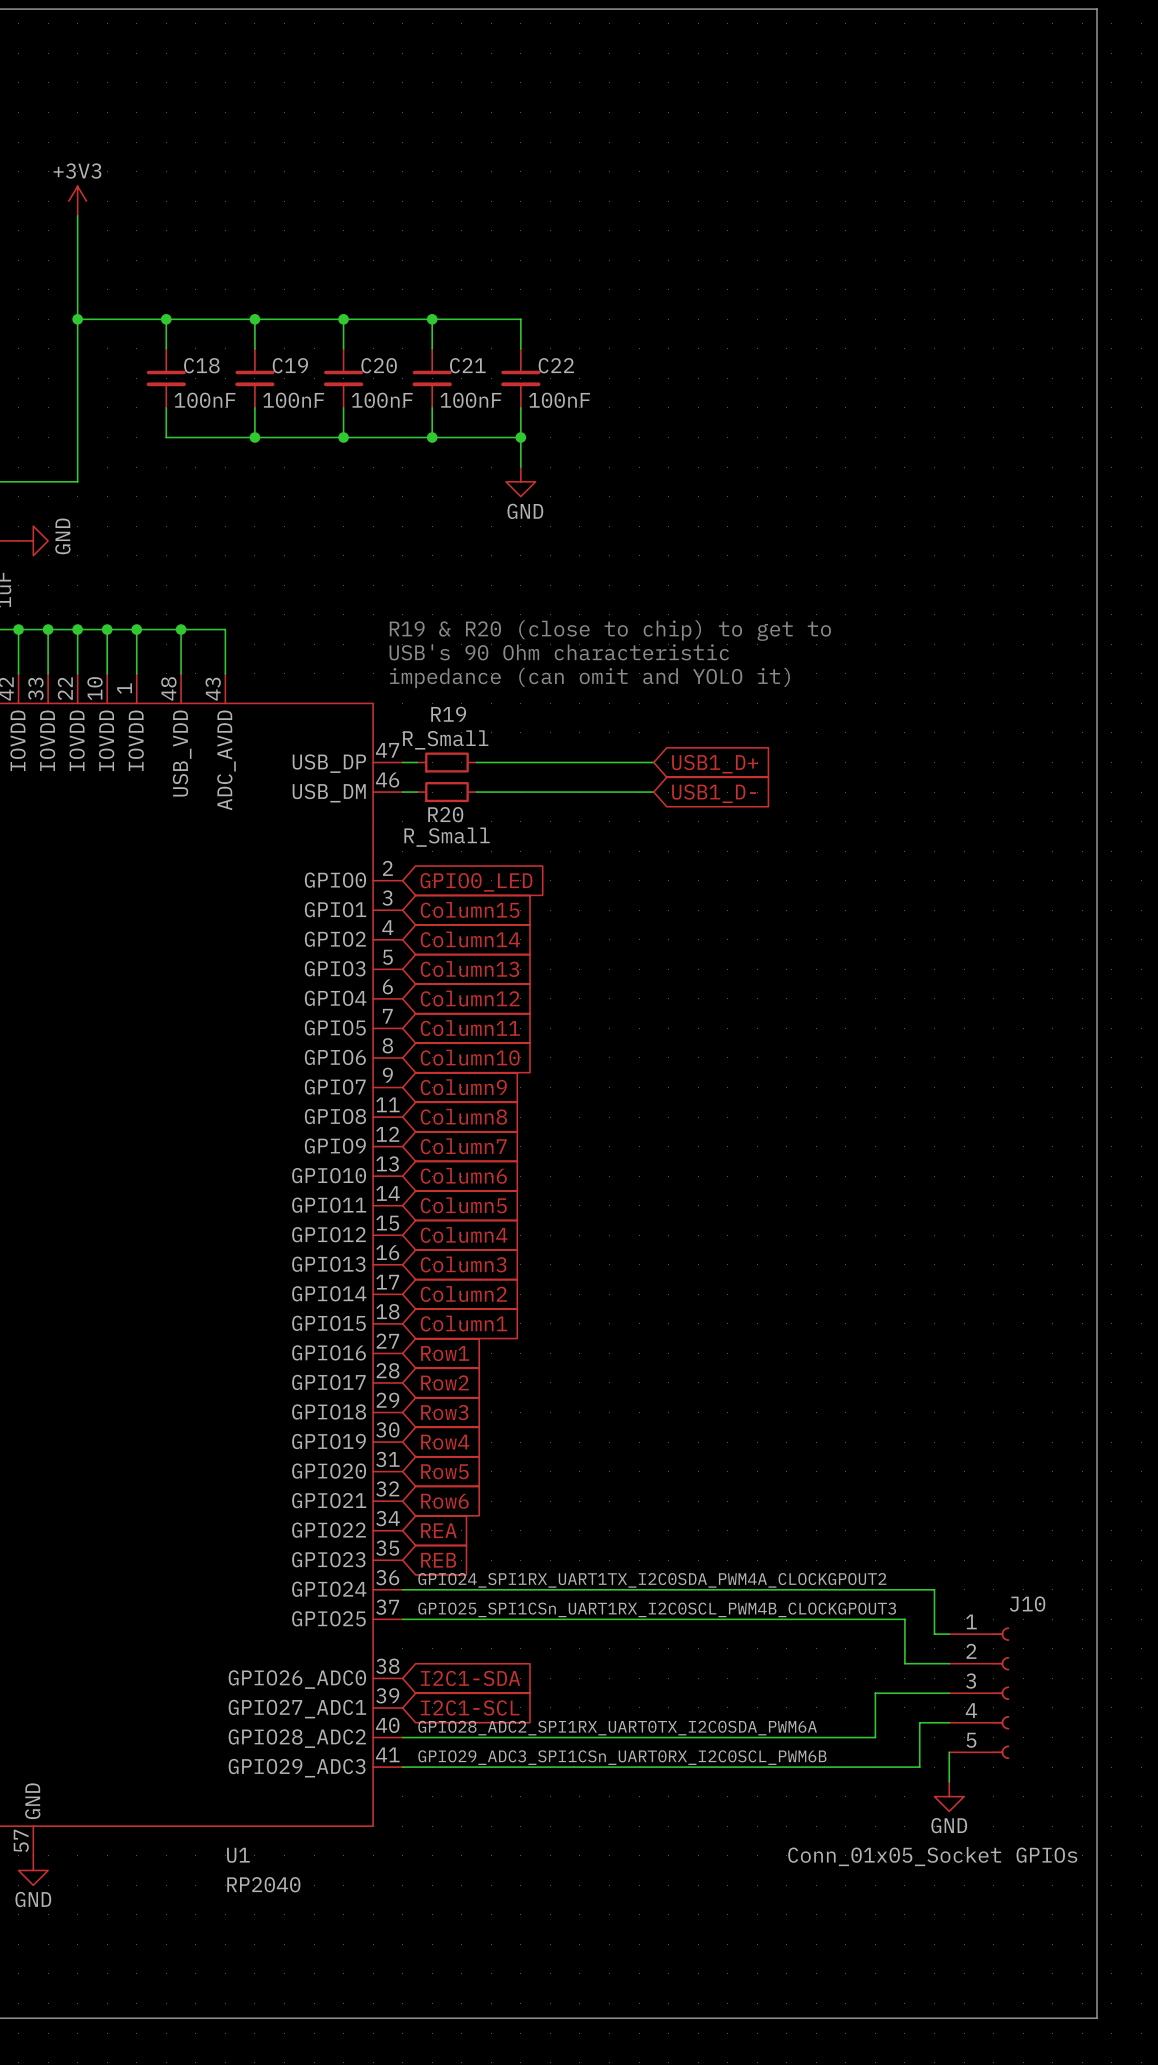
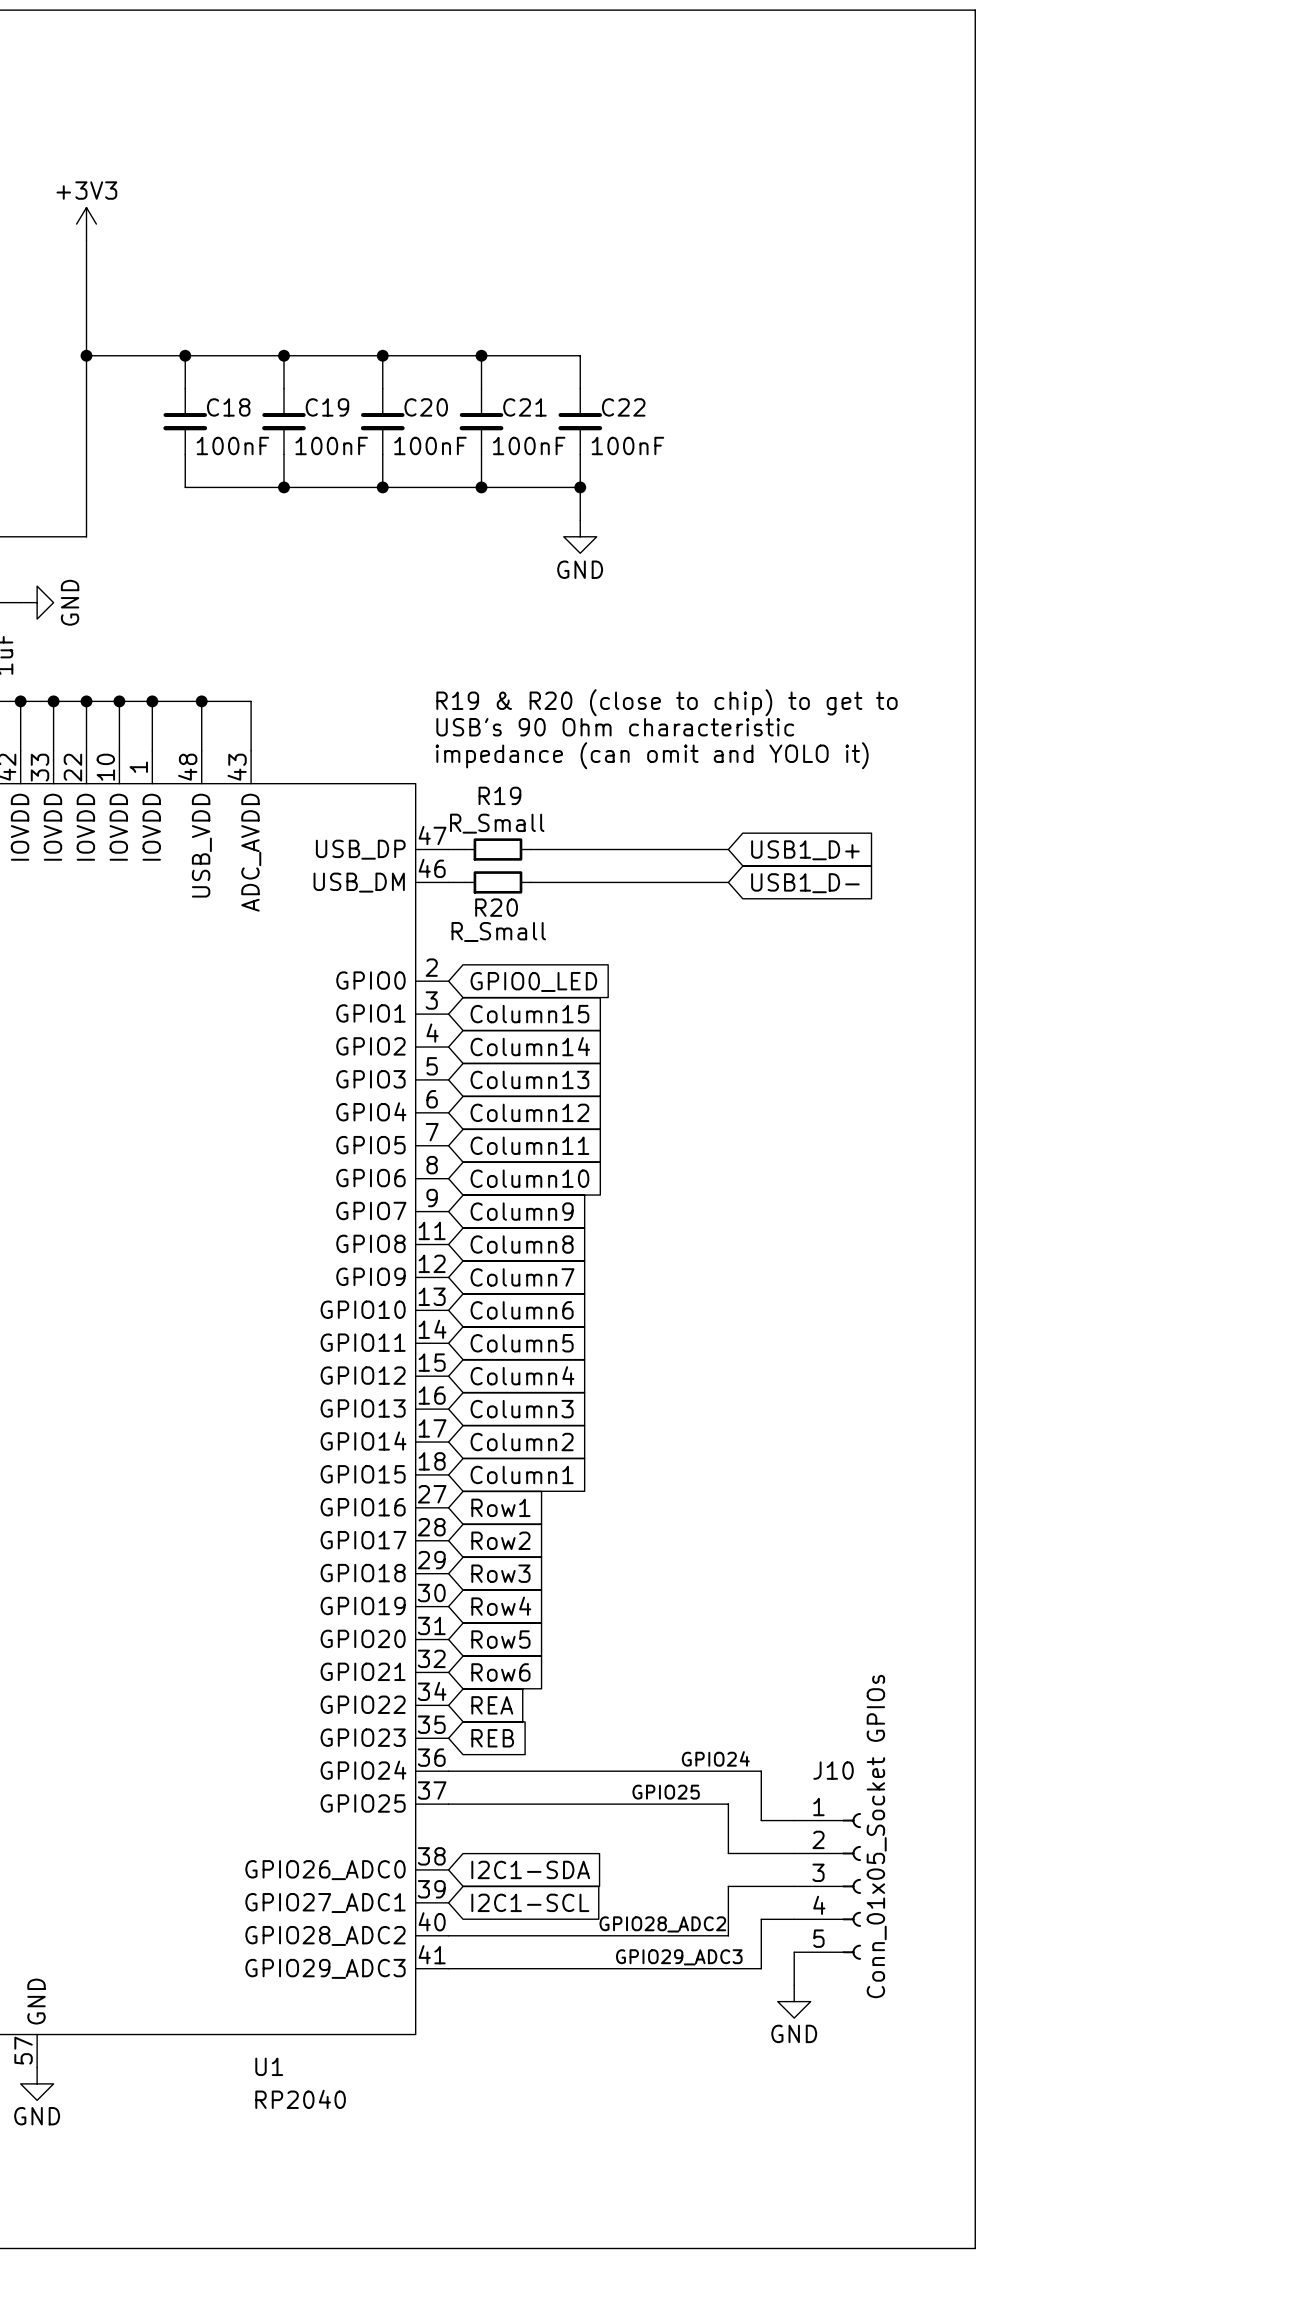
line: (875, 9) (1096, 9) (1096, 2018) (875, 2018) -> (975, 10) (975, 2248)
label: none -> GPIO24 (715, 1758)
label: GPIO24_SPI1RX_UART1TX_I2C0SDA_PWM4A_CLOCKGPOUT2 (652, 1580) -> none
wire: (683, 1589) (934, 1589) (934, 1634) (949, 1634) -> (761, 1771) (761, 1820) (794, 1820)
J10 name position: J10 (1027, 1604) -> J10 (833, 1770)
label: none -> GPIO25 (666, 1792)
label: GPIO25_SPI1CSn_UART1RX_I2C0SCL_PWM4B_CLOCKGPOUT3 (657, 1609) -> none
wire: (653, 1619) (904, 1619) (904, 1663) (949, 1663) -> (728, 1804) (728, 1853) (794, 1853)
wire: (949, 1693) (875, 1693) (875, 1737) (653, 1737) -> (794, 1886) (728, 1886) (728, 1935)
J10 position: (979, 1693) -> (827, 1886)
wire: (949, 1722) (919, 1722) (919, 1767) (683, 1767) -> (794, 1919) (761, 1919) (761, 1968)
label: none -> GPIO28_ADC2 (662, 1924)
label: GPIO28_ADC2_SPI1RX_UART0TX_I2C0SDA_PWM6A (617, 1728) -> none
wire: (949, 1752) (949, 1781) -> (794, 1952) (794, 1985)
label: none -> GPIO29_ADC3 (679, 1957)
label: GPIO29_ADC3_SPI1CSn_UART0RX_I2C0SCL_PWM6B (622, 1757) -> none
power symbol position: GND (949, 1796) -> GND (794, 2001)
J10 value rotation: 0° (932, 1856) -> 90° counterclockwise (876, 1836)

